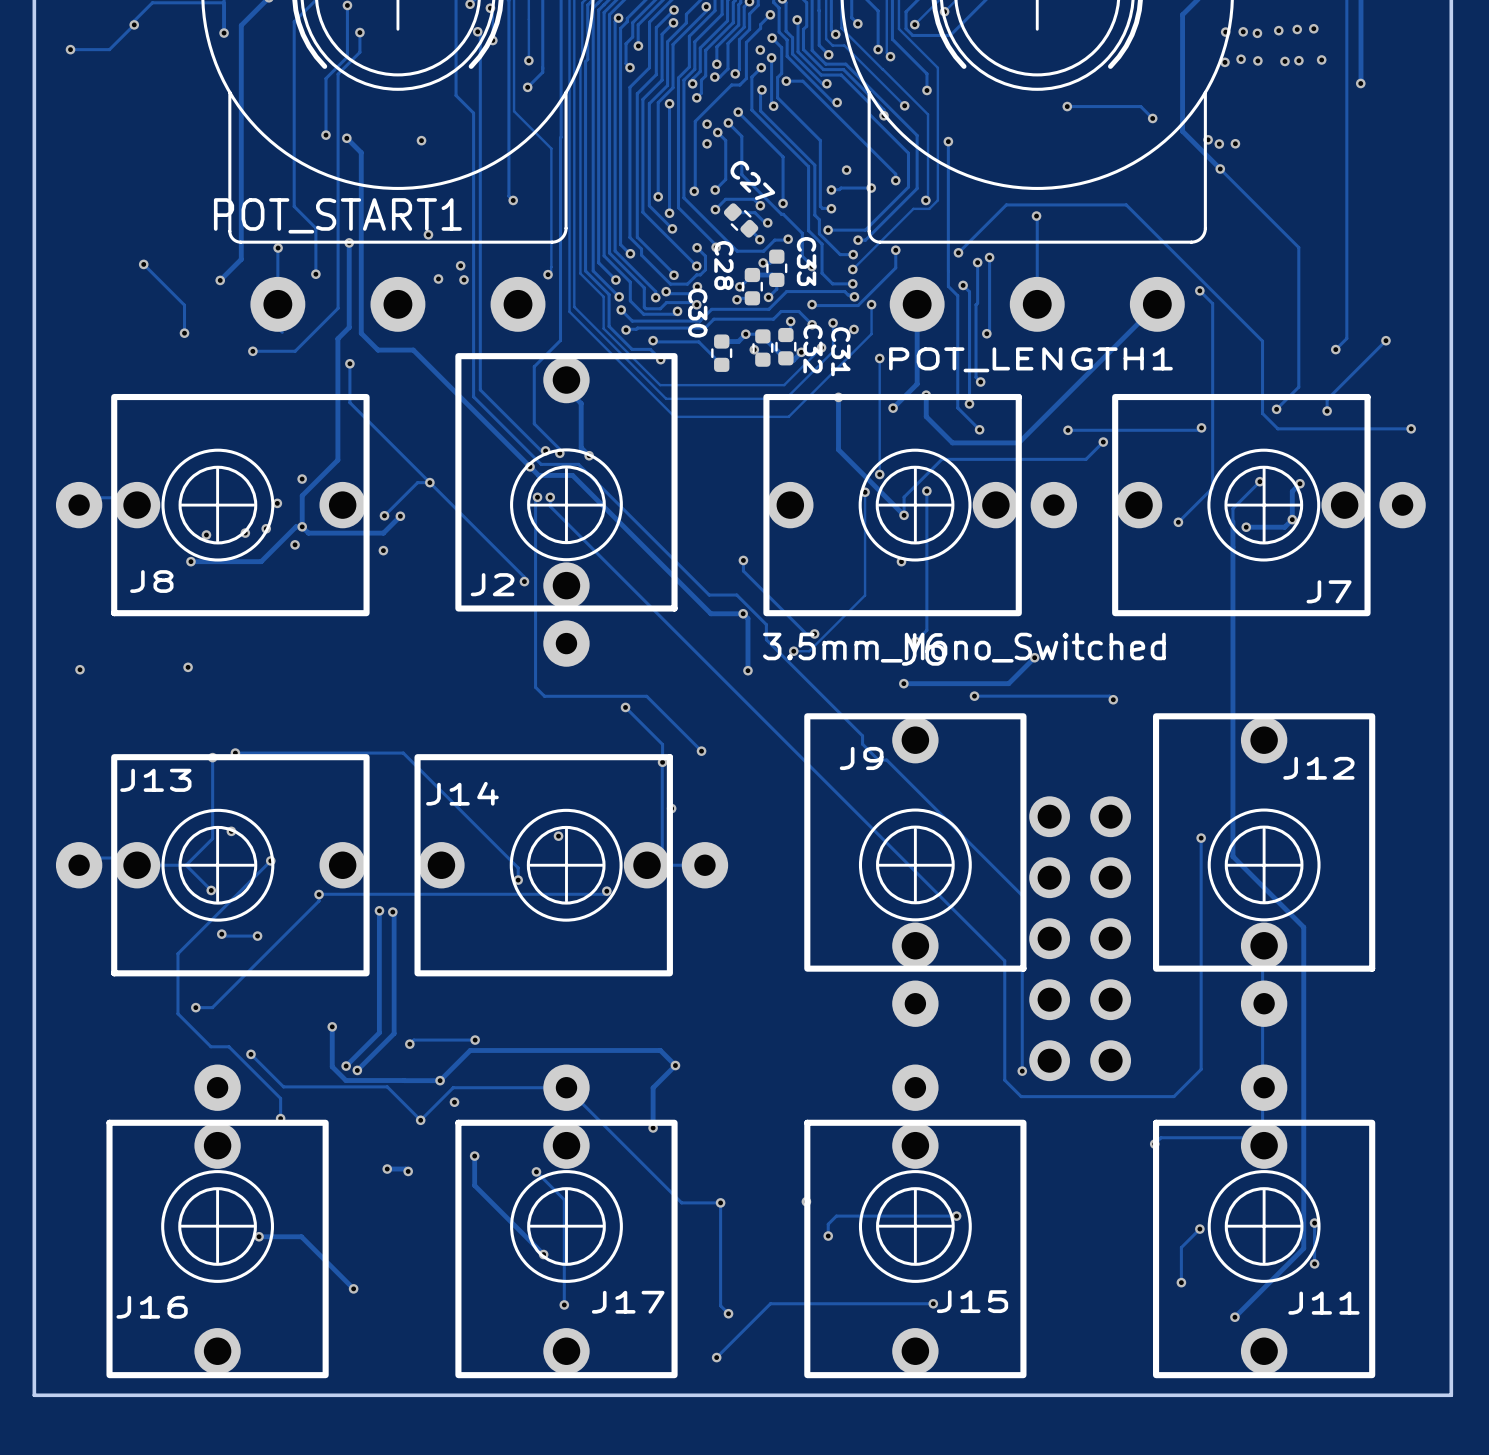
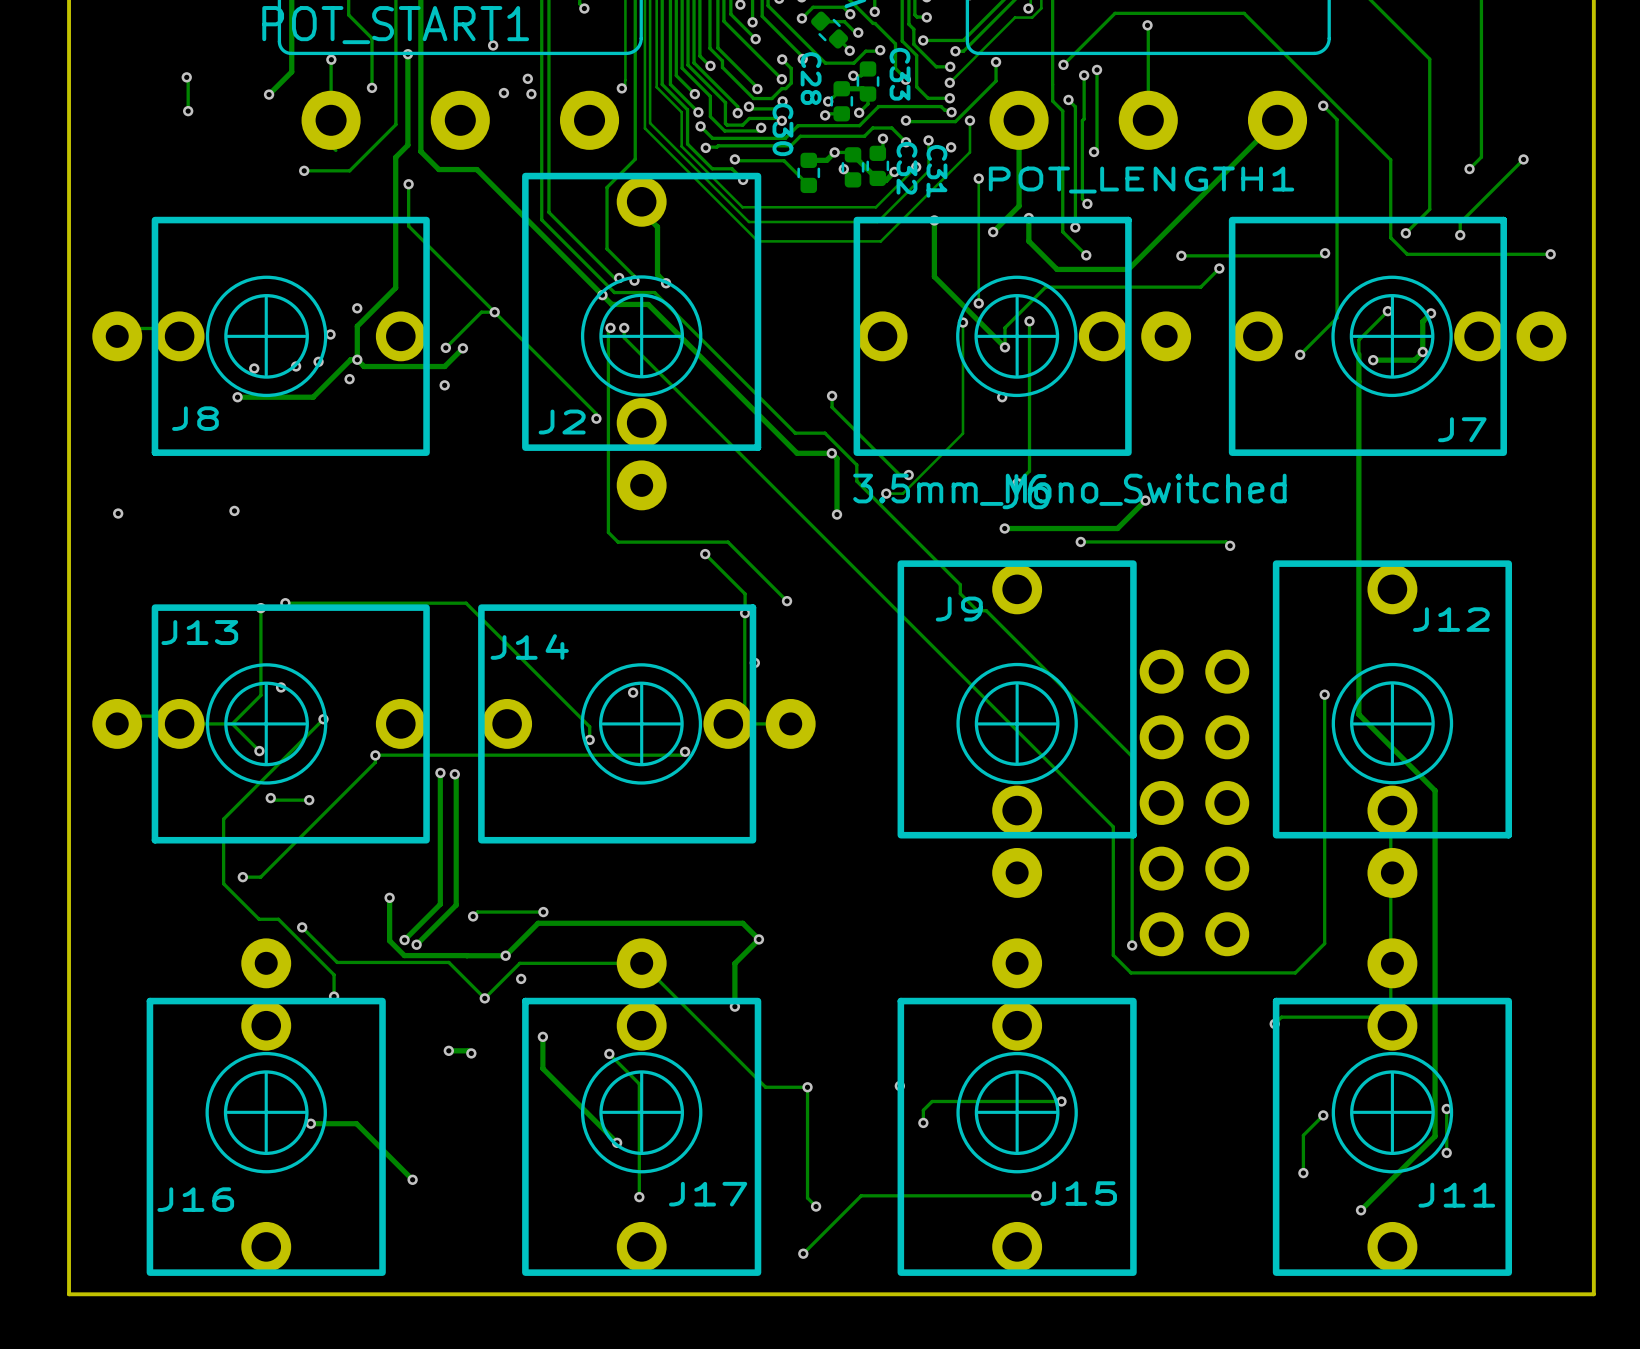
track: (145, 265) (184, 305) (184, 333) -> (188, 78) (188, 111)
via position: (184, 333) -> (188, 111)

